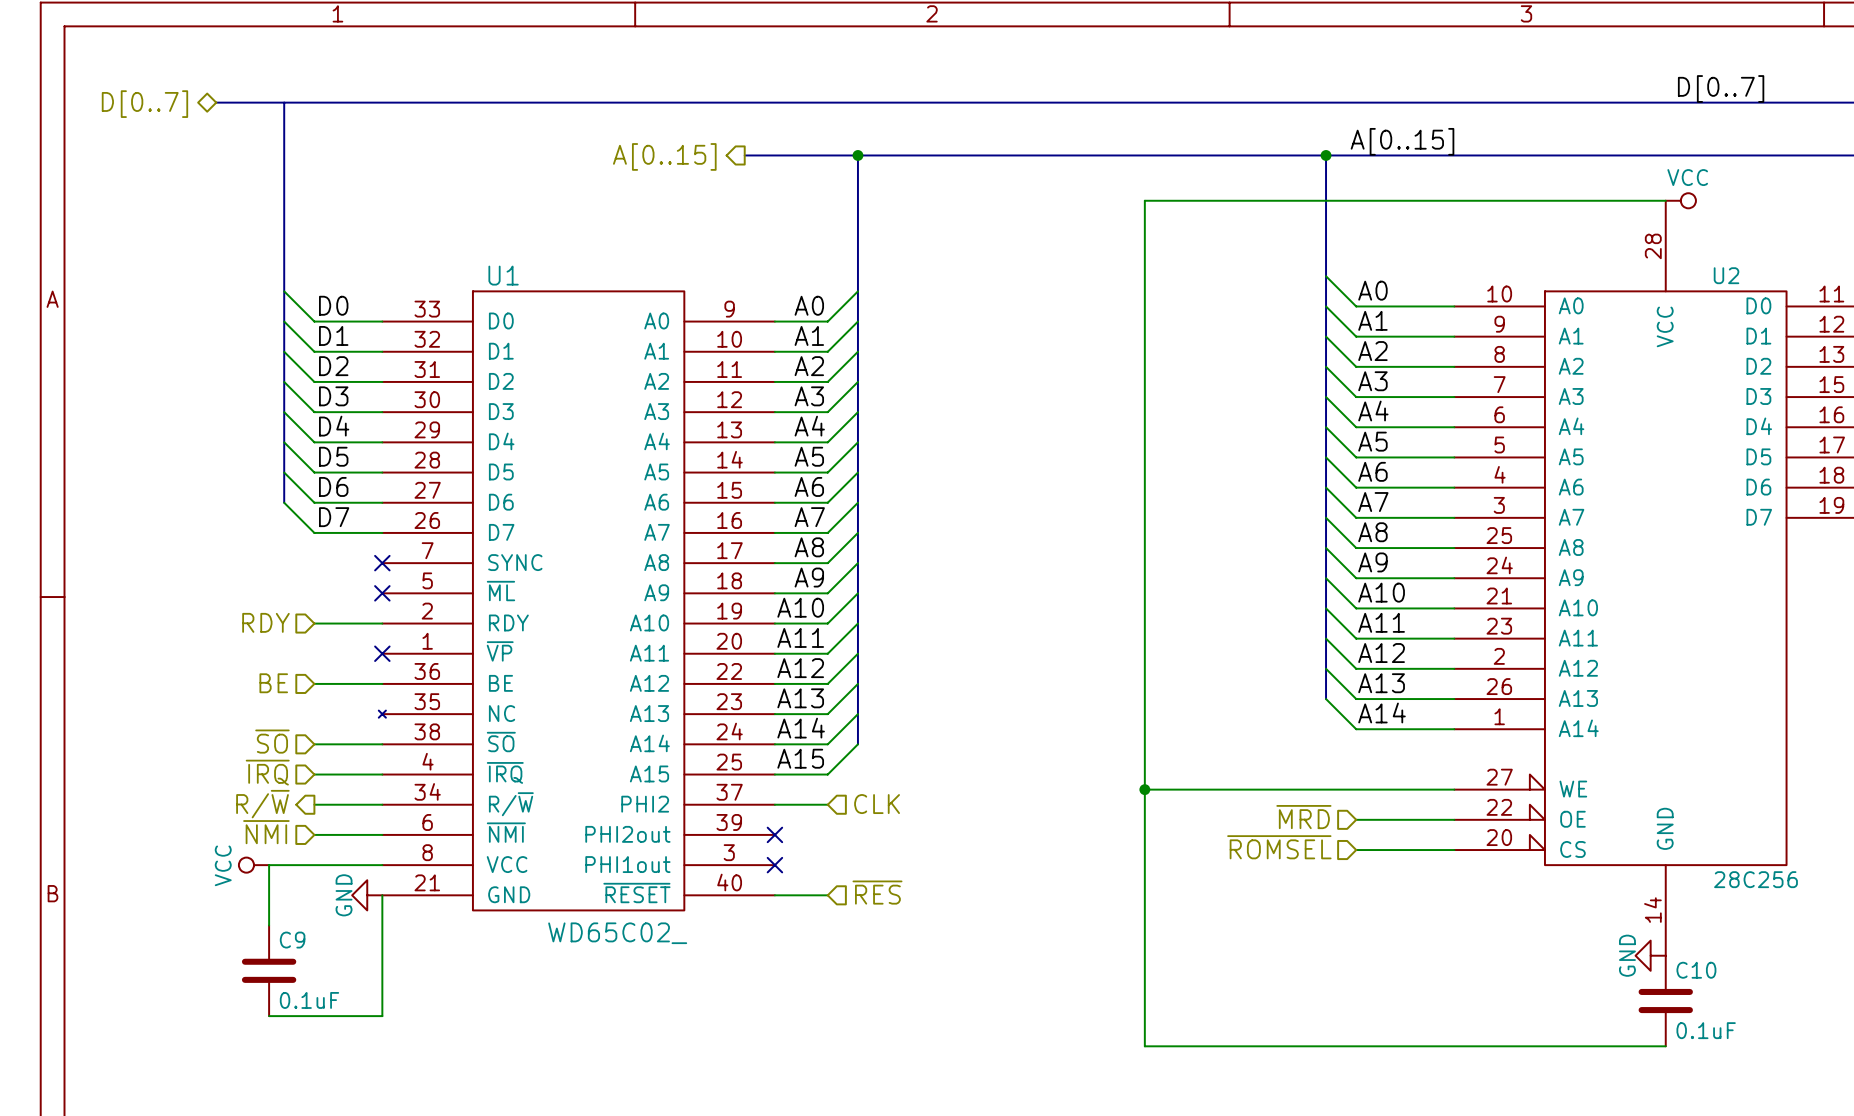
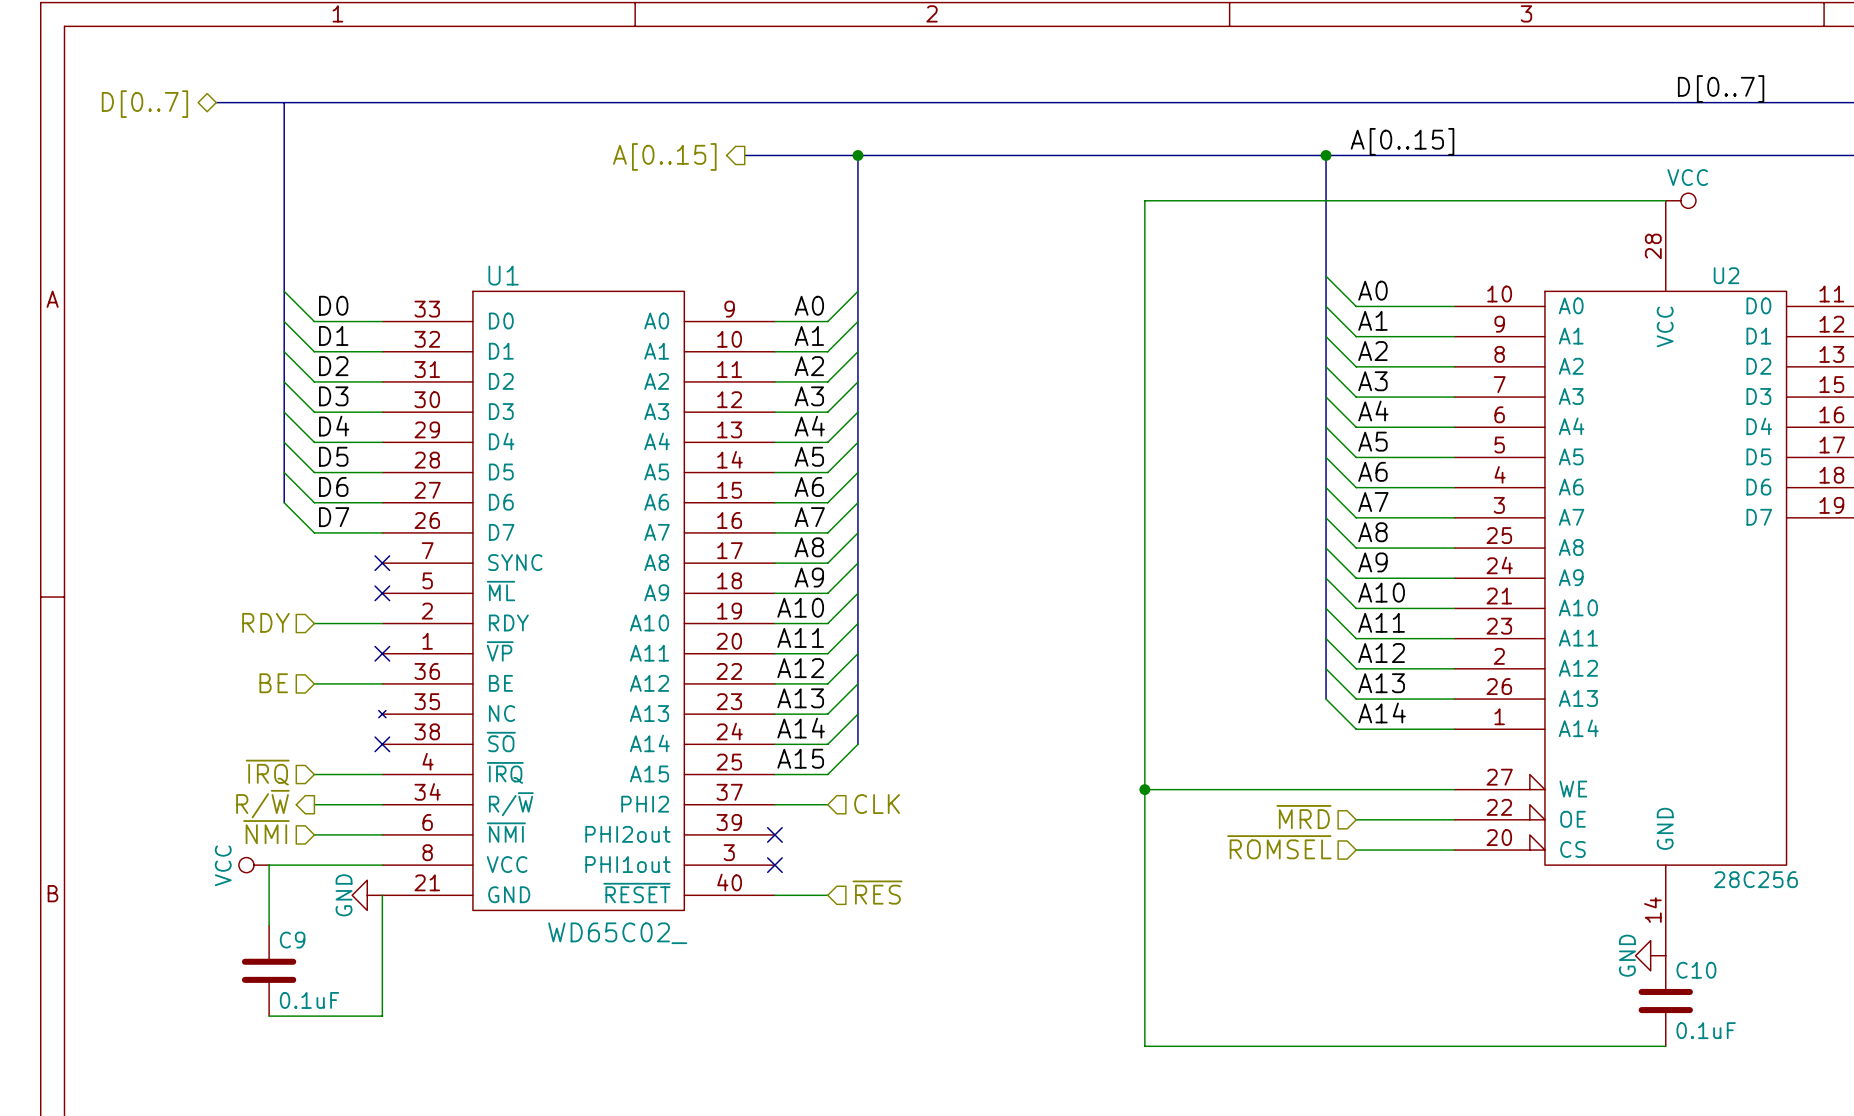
hierarchical label: ~{SO} (272, 741) -> none
wire: (314, 744) (382, 744) -> none
no-connect mark: none -> (382, 744)

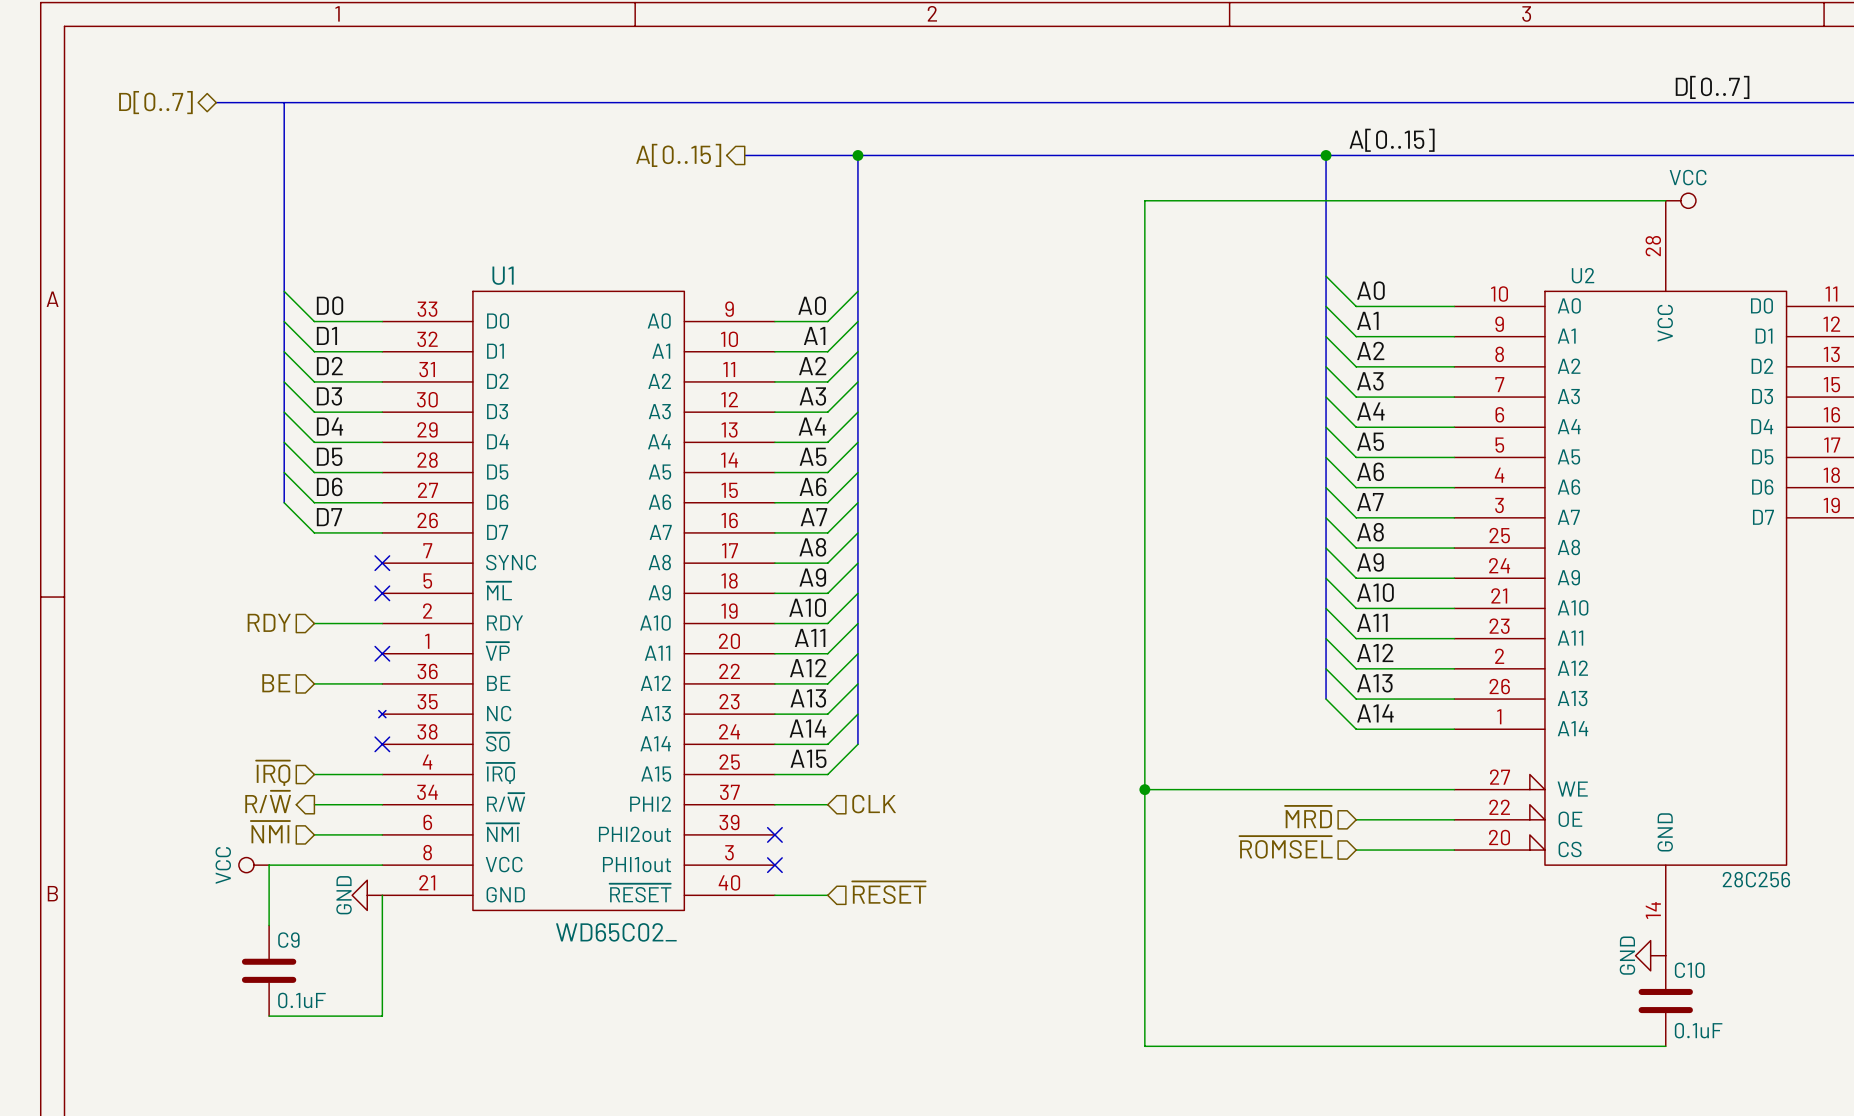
U2 name position: U2 (1726, 275) -> U2 (1583, 275)
hierarchical label: ~{RES} (877, 892) -> ~{RESET} (889, 892)

